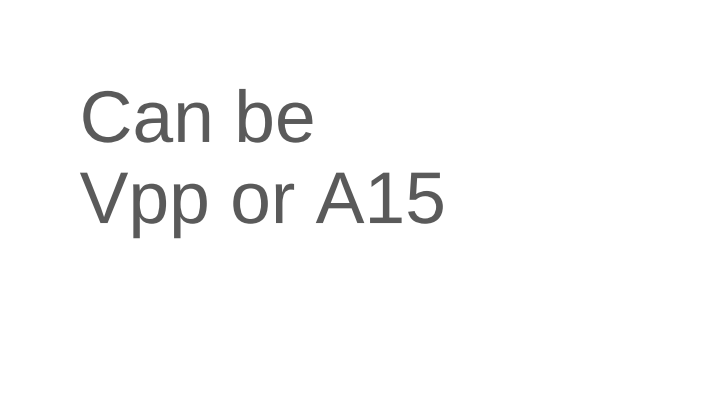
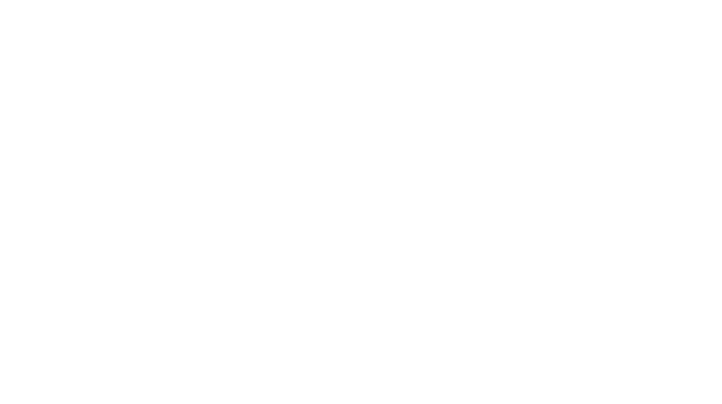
text: Can be (197, 115) -> none
text: Vpp or A15 (261, 205) -> none

